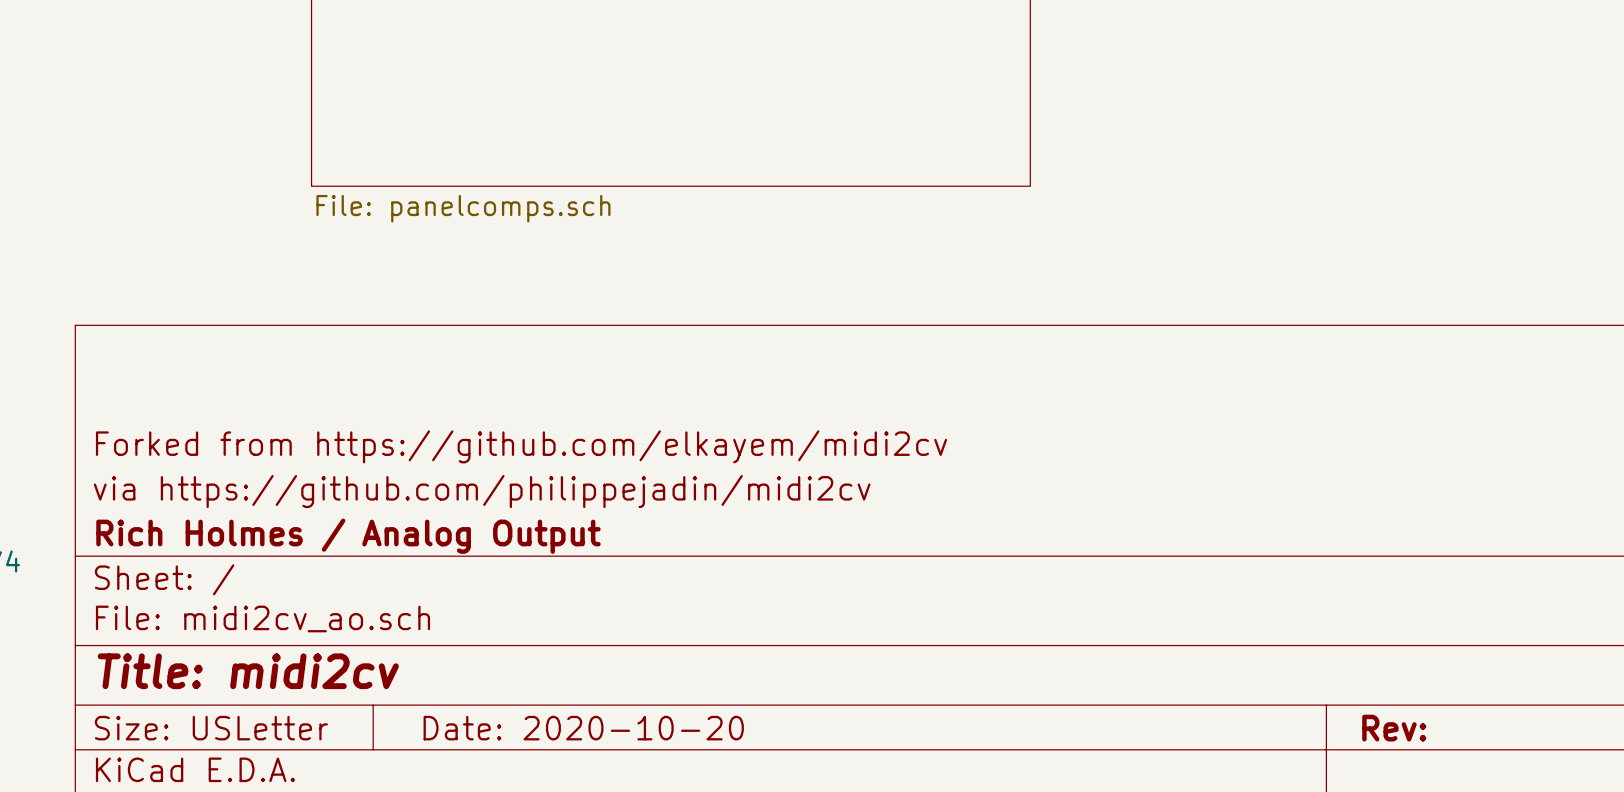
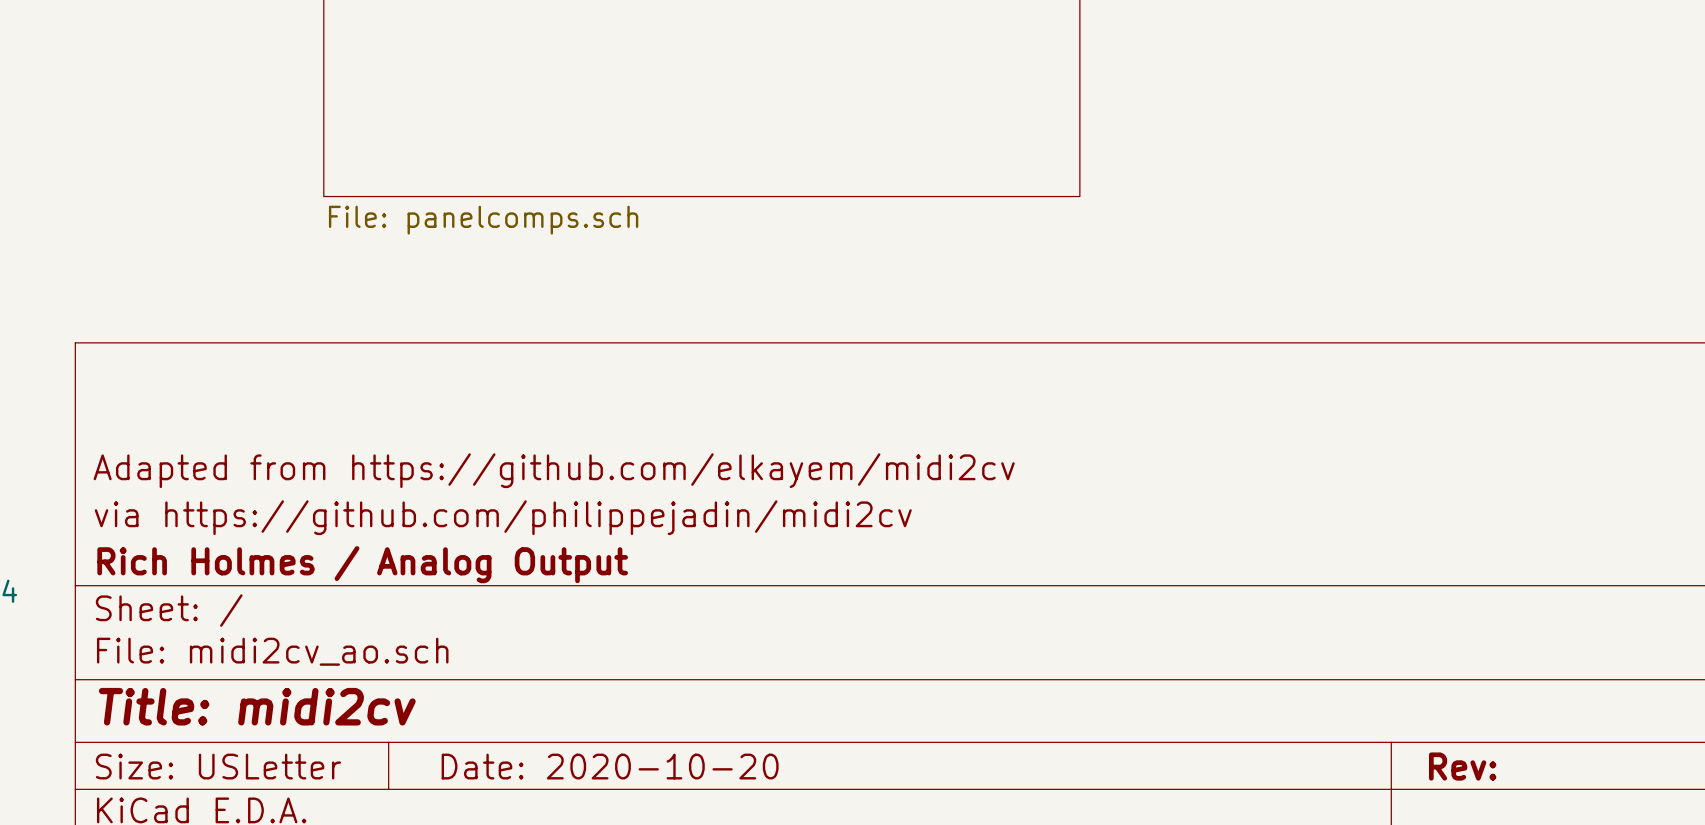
title block: Forked from https://github.com/elkayem/midi2cv (521, 446) -> Adapted from https://github.com/elkayem/midi2cv (554, 470)

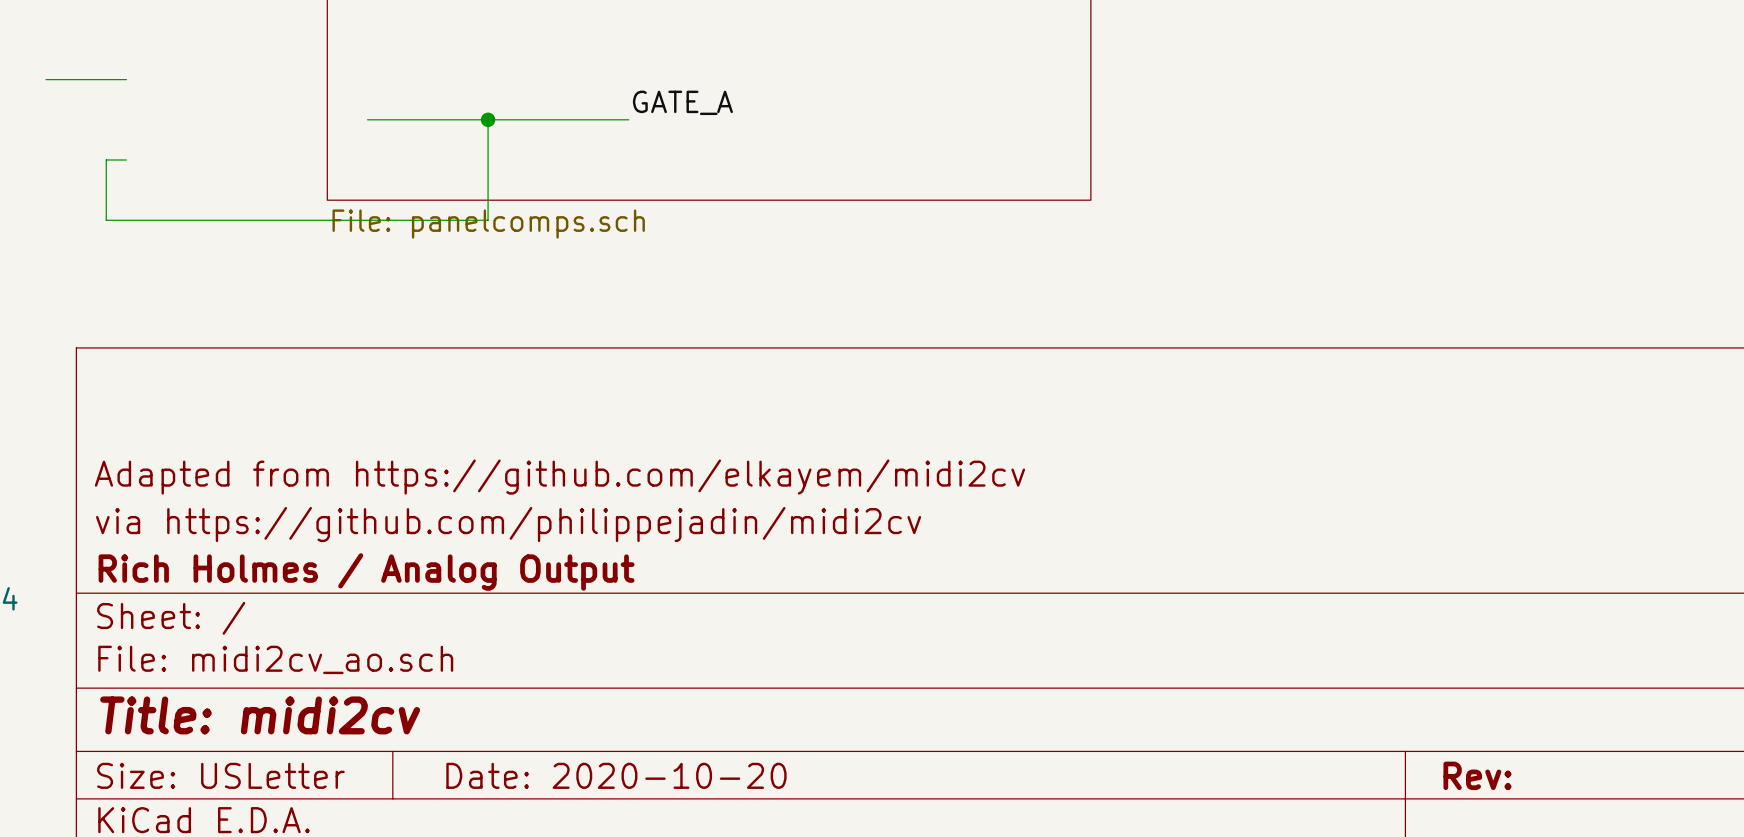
wire: none -> (46, 79) (126, 79)
label: none -> GATE_A (682, 102)
wire: none -> (367, 119) (628, 119)
wire: none -> (488, 119) (488, 220) (106, 220) (106, 160) (126, 160)
junction: none -> (488, 119)

